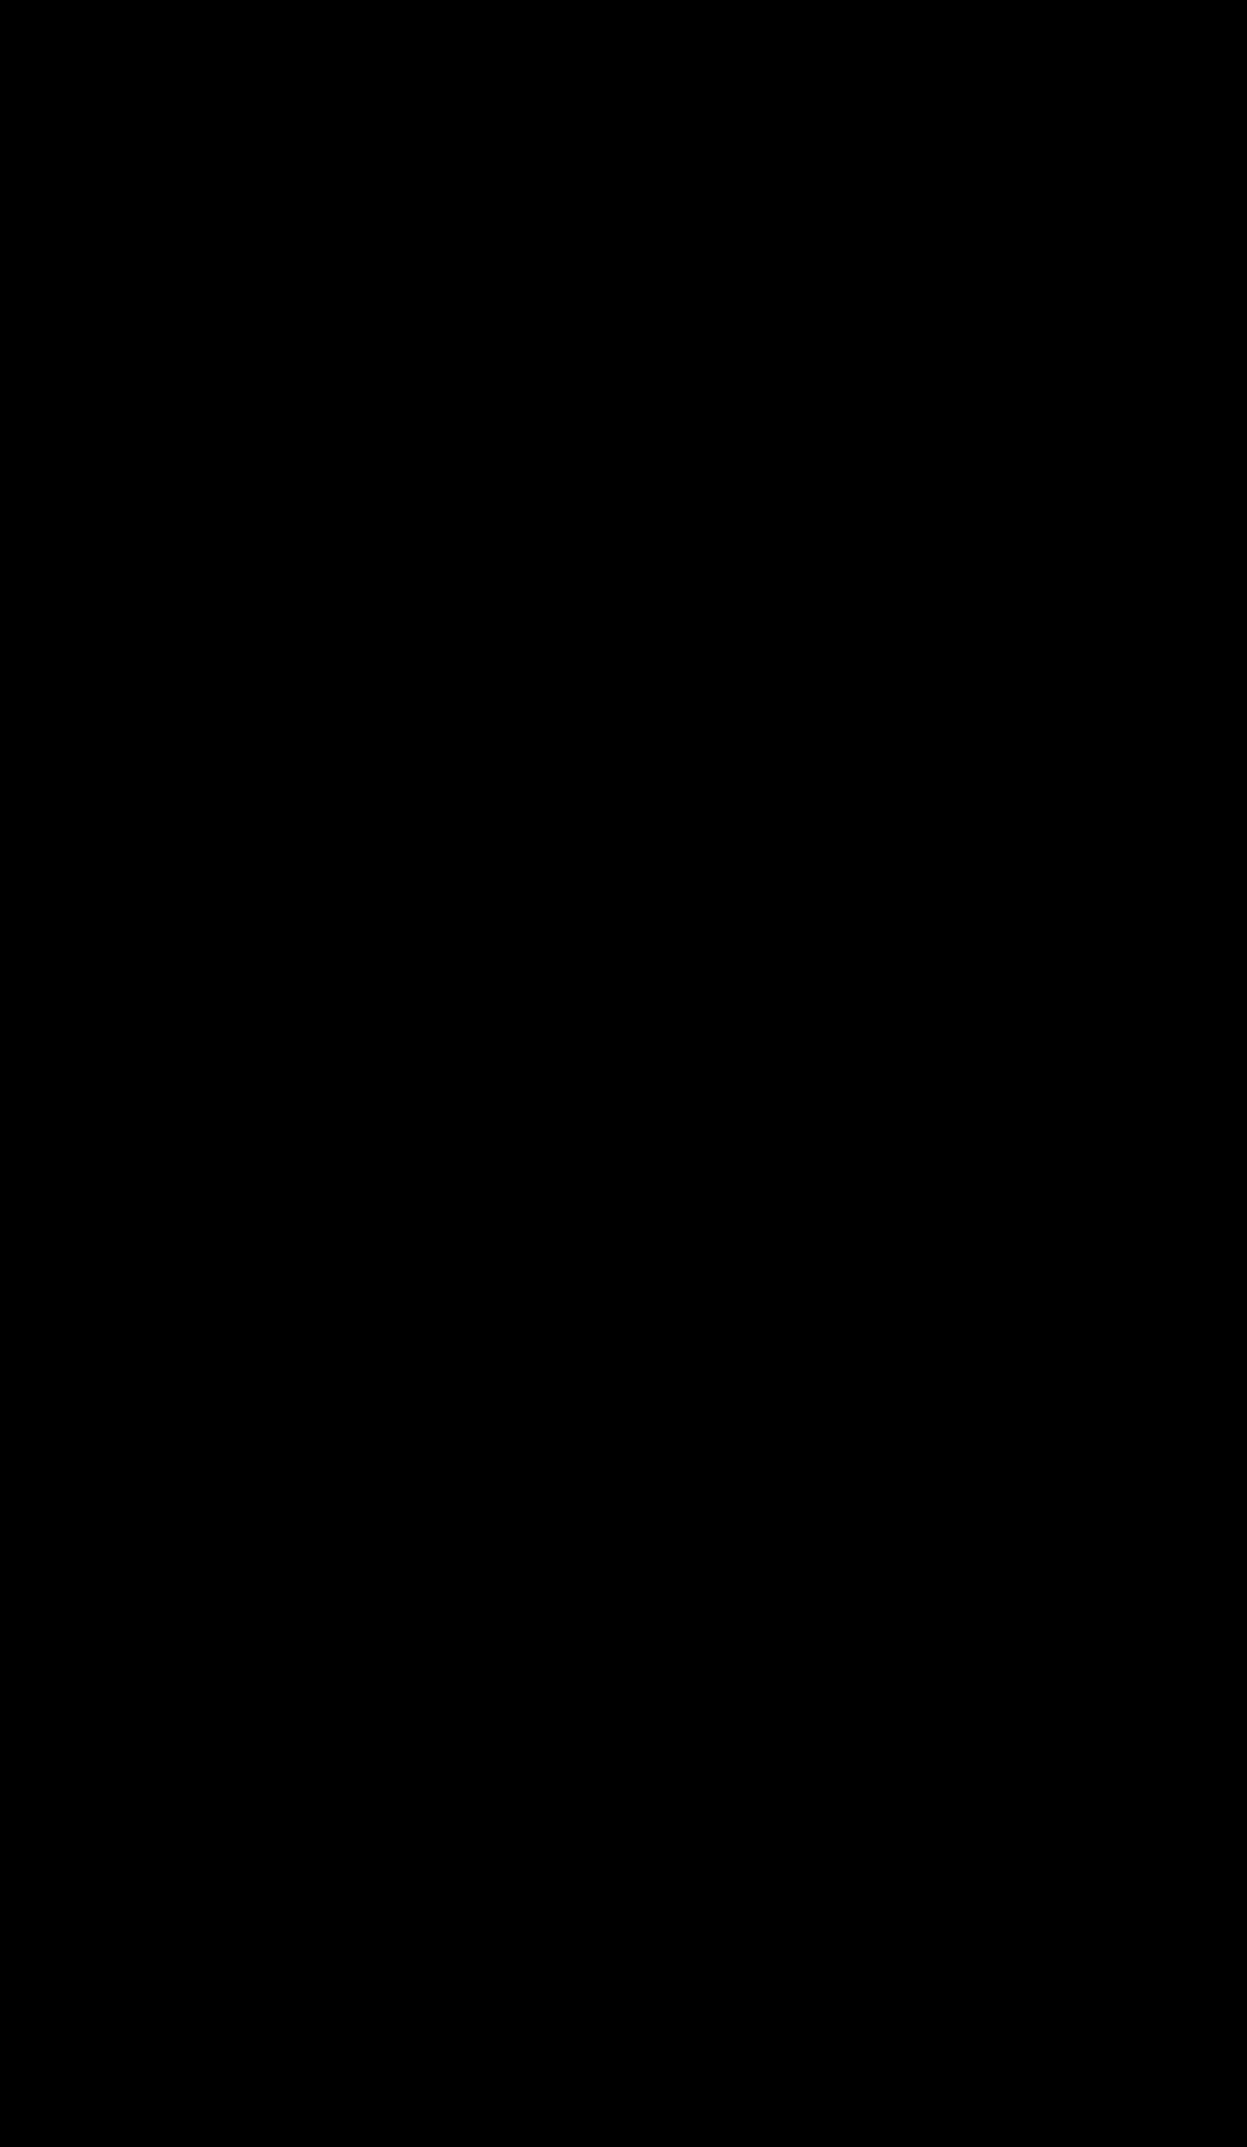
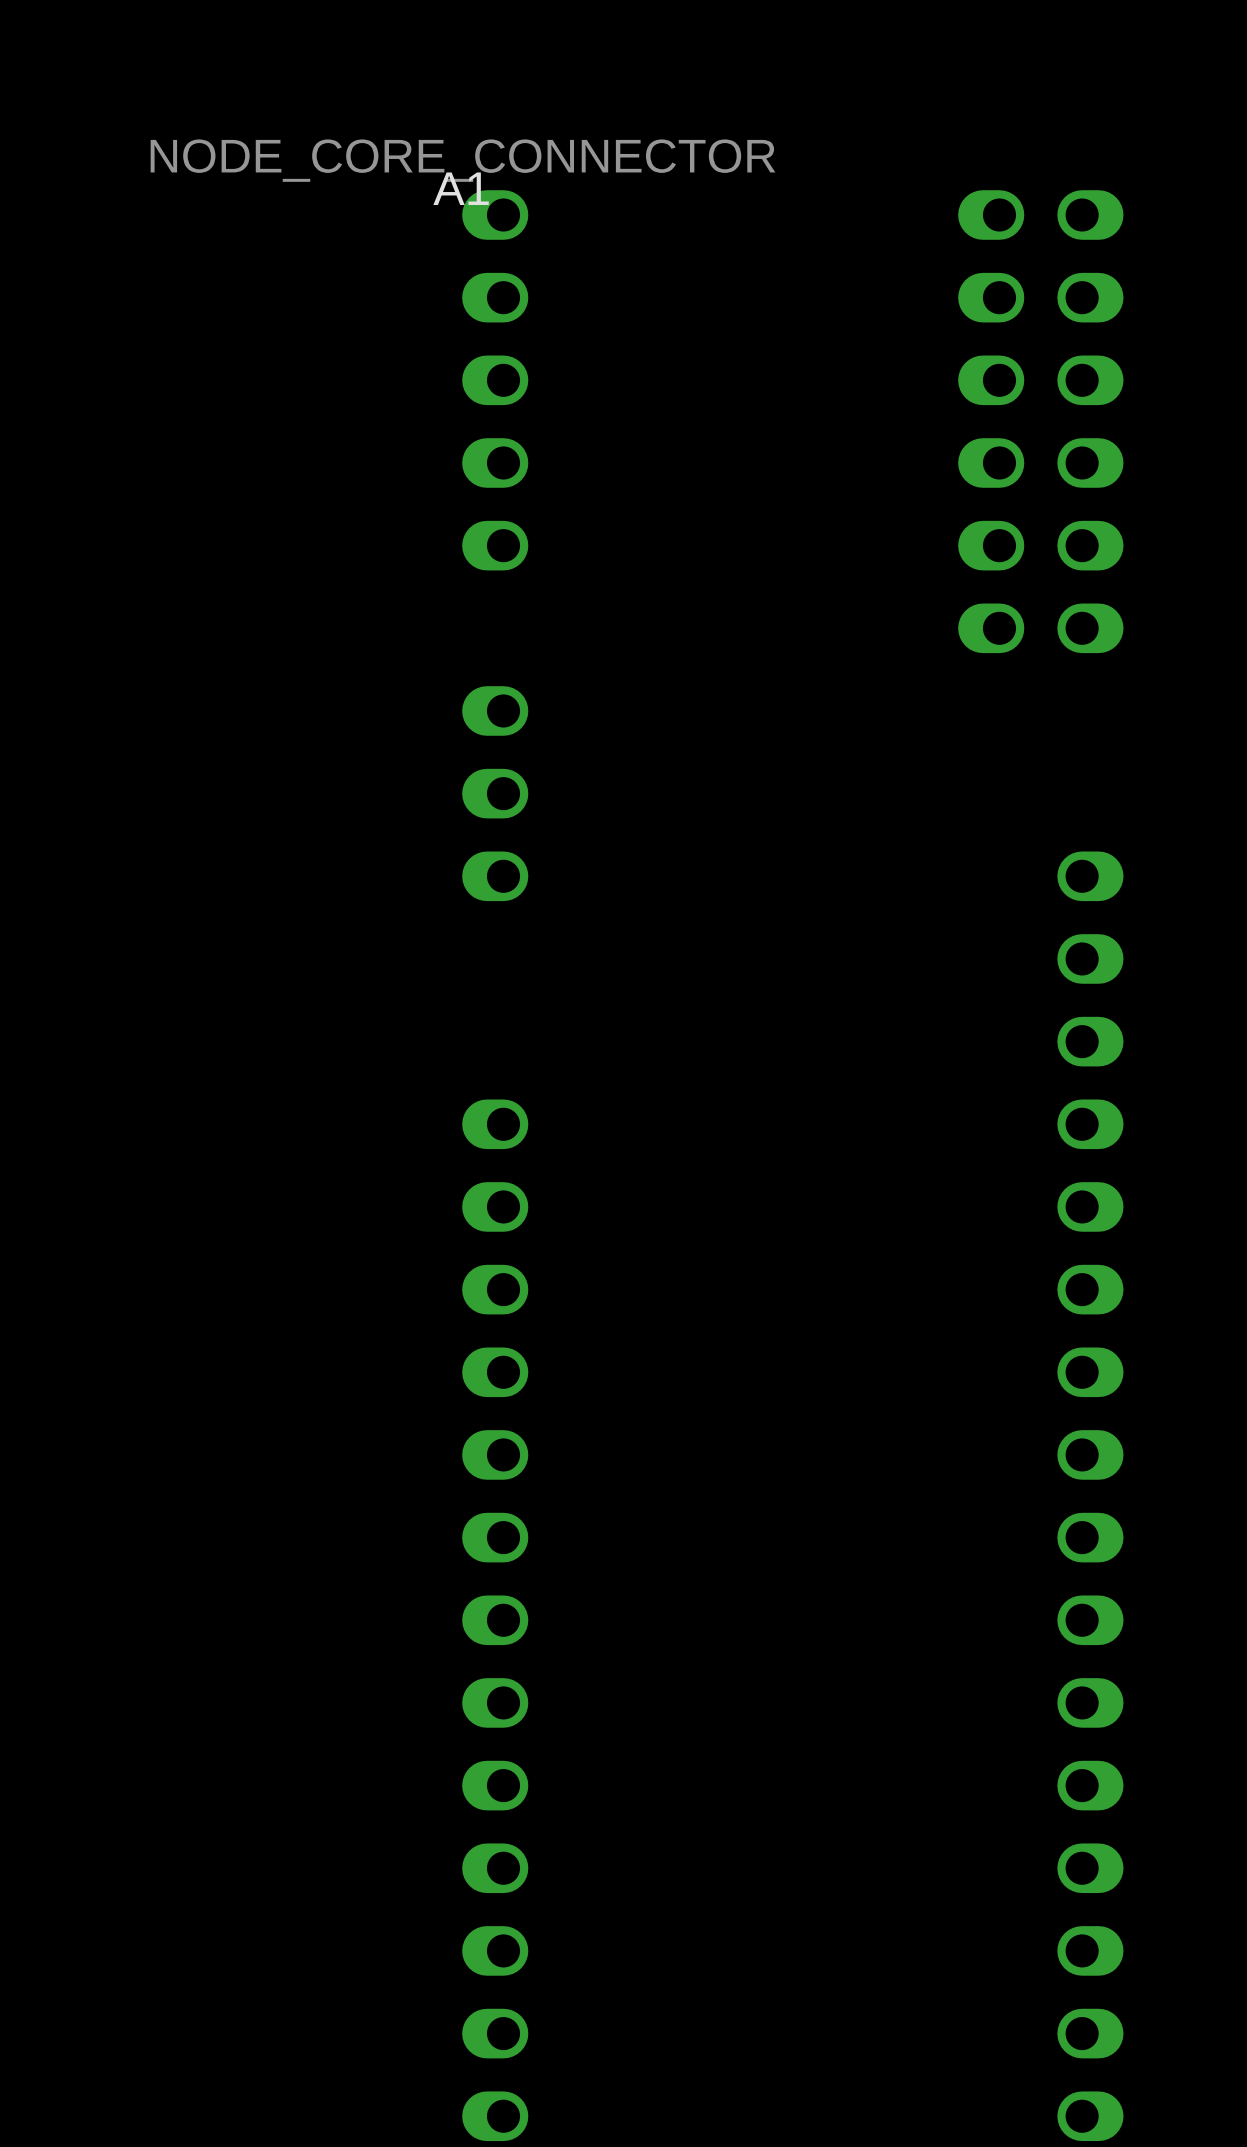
A1: none -> NODE_CORE_CONNECTOR (792, 1165)

